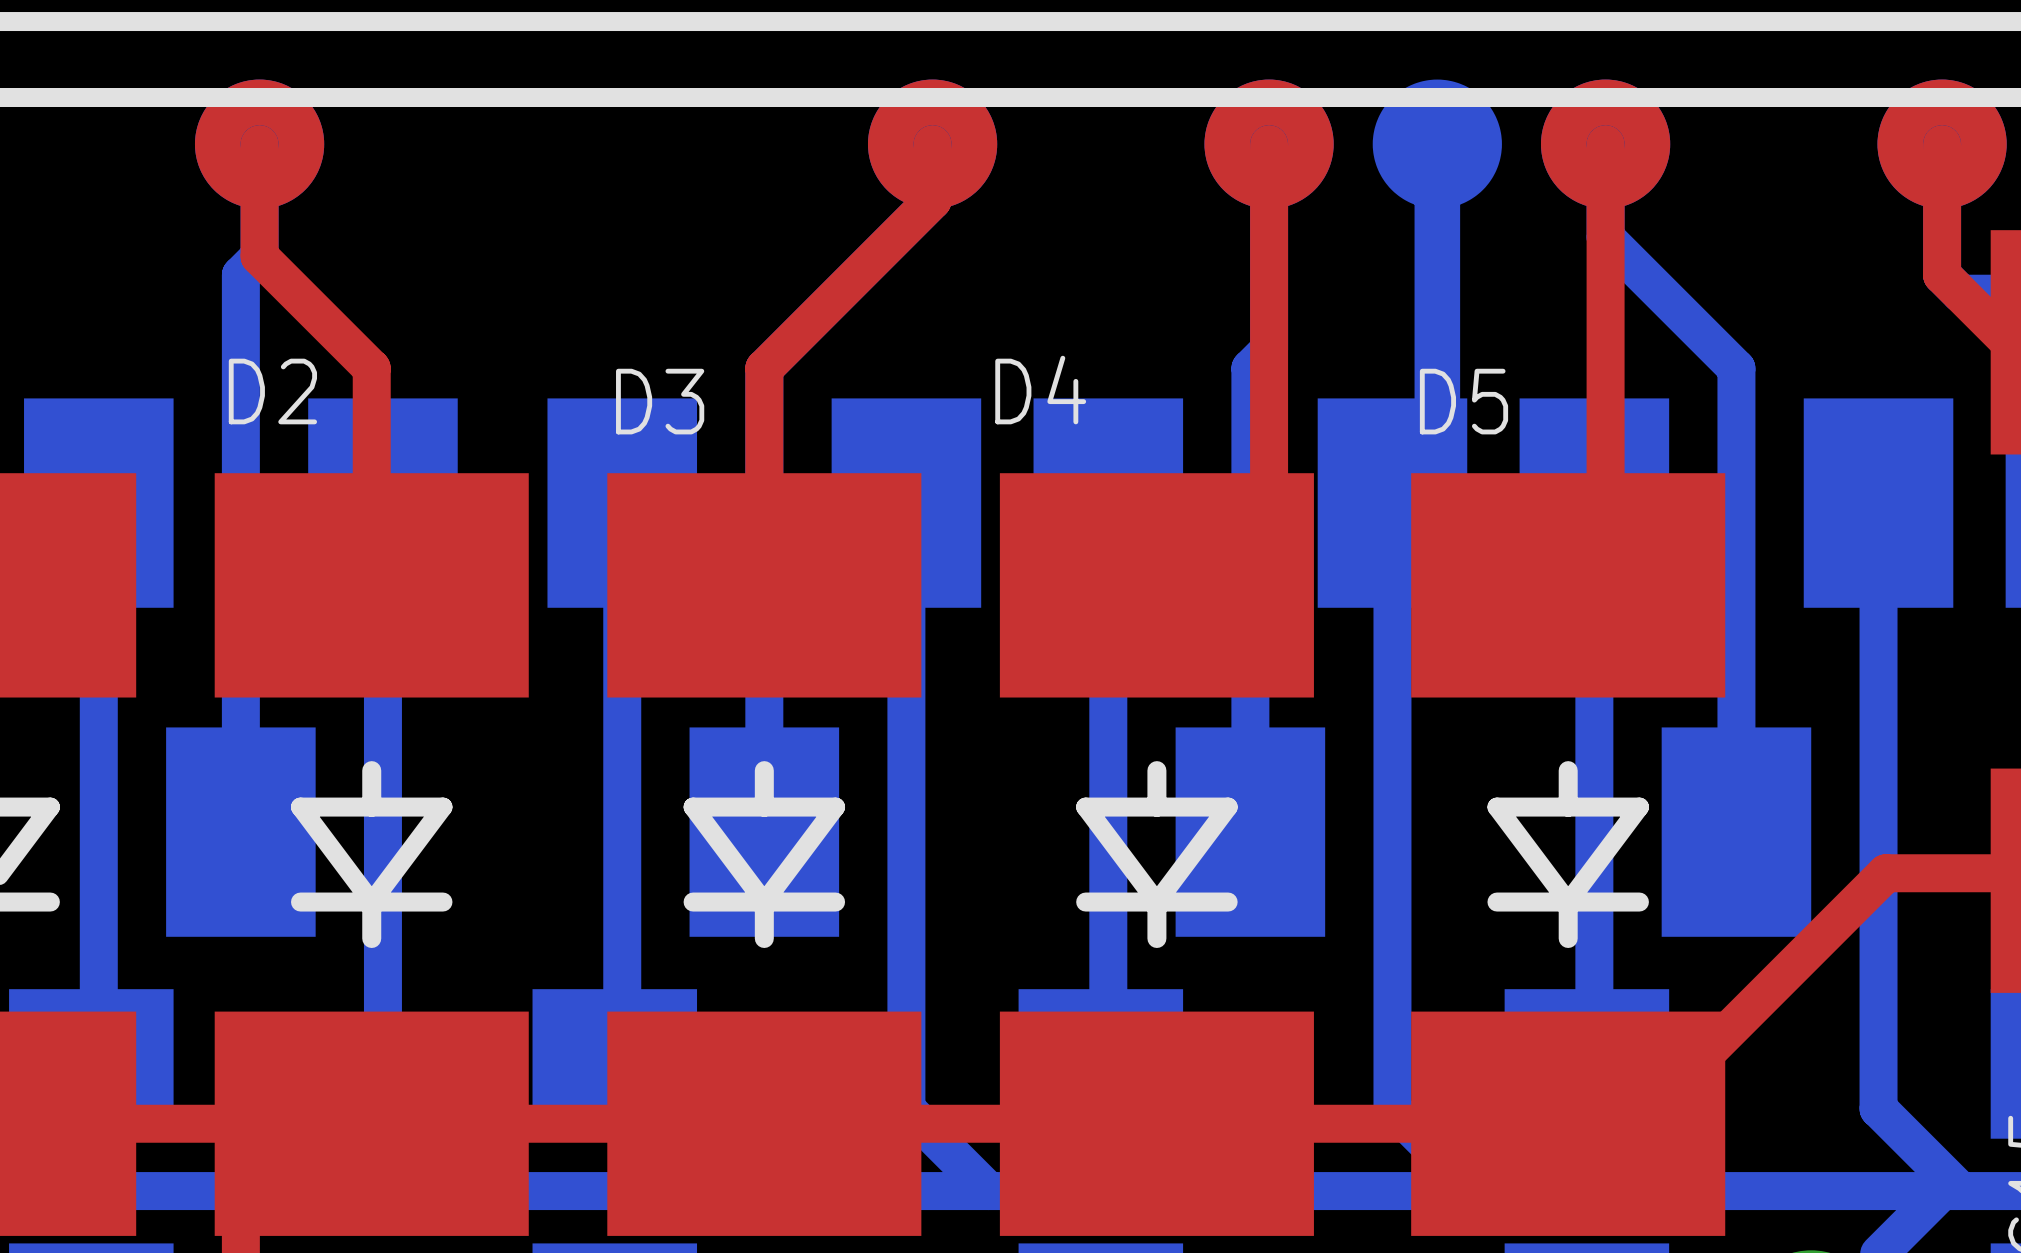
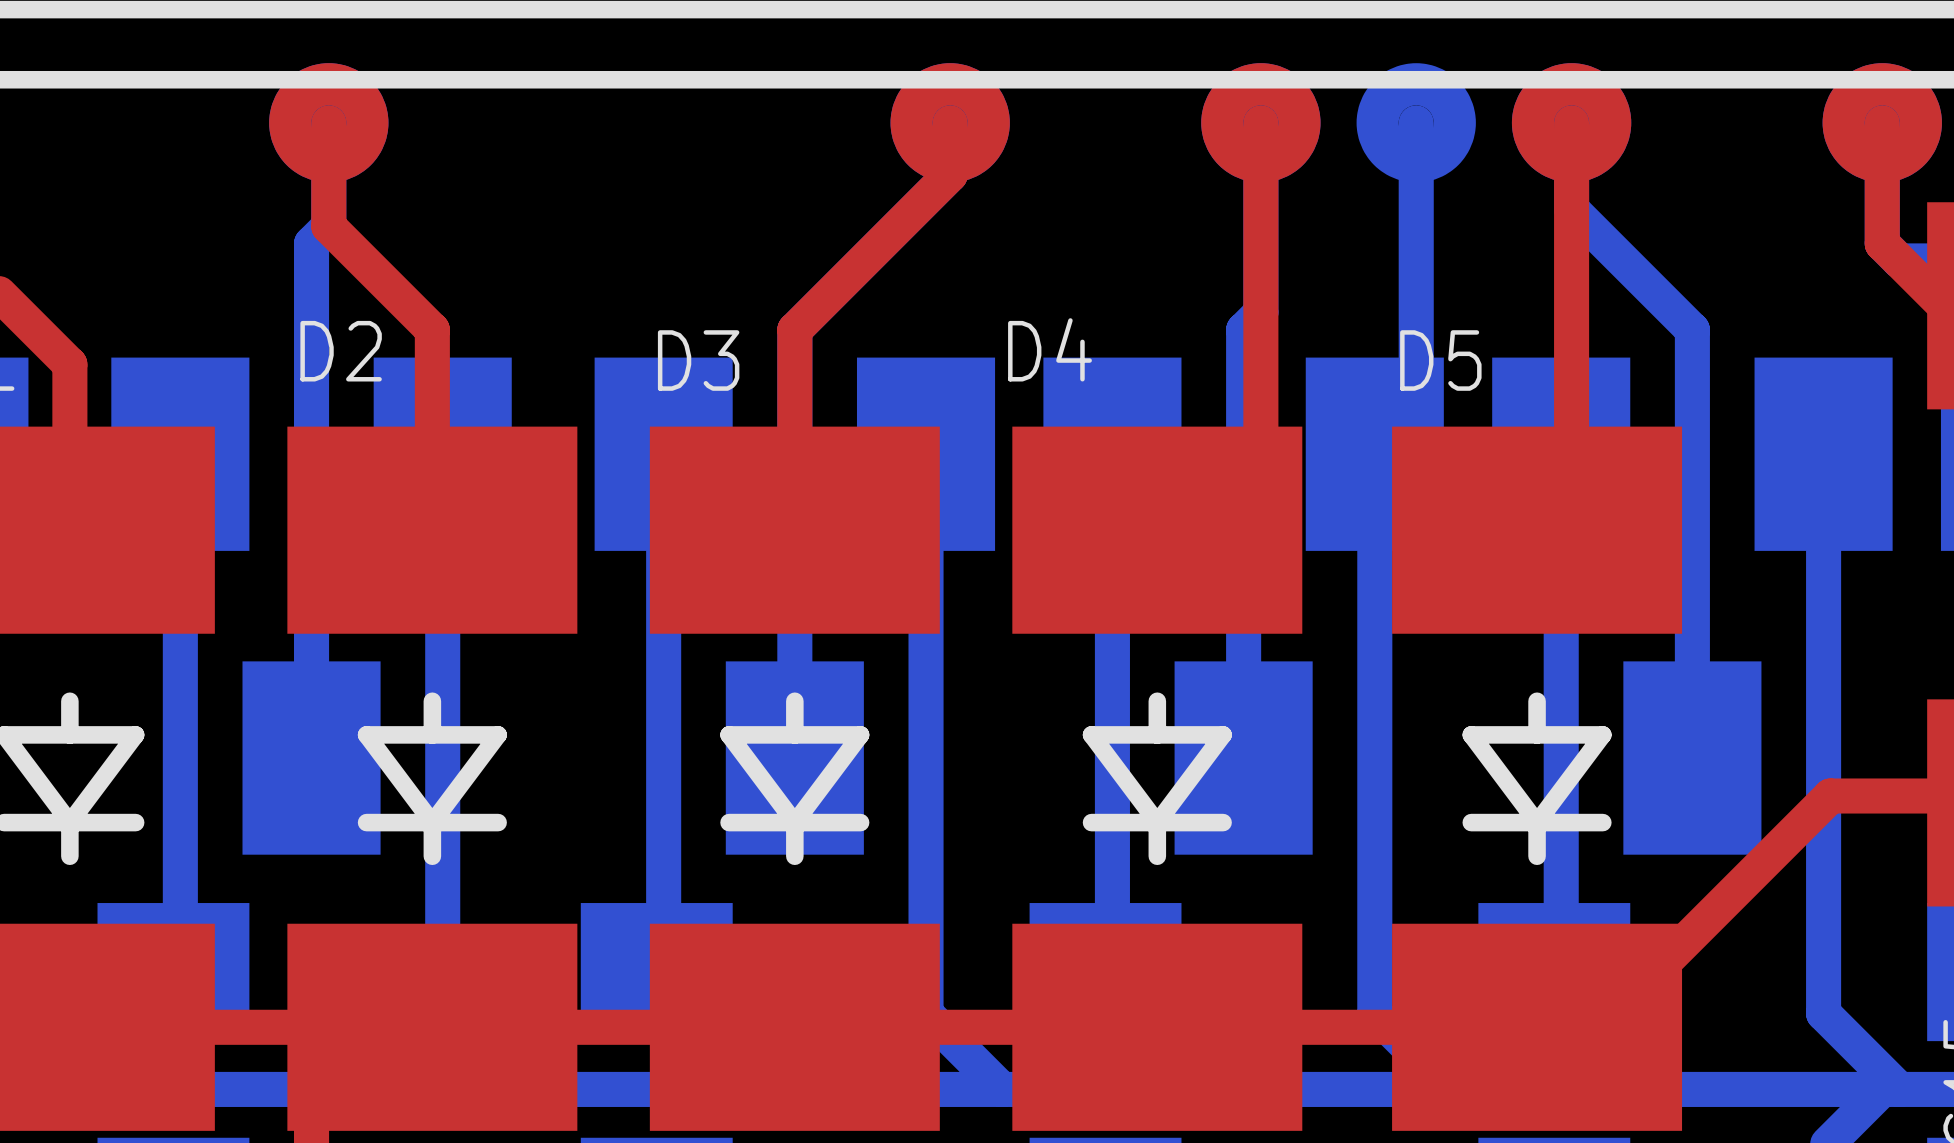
bottom track width: thick (1437, 144) (1437, 458) -> thin (1416, 122) (1416, 412)

